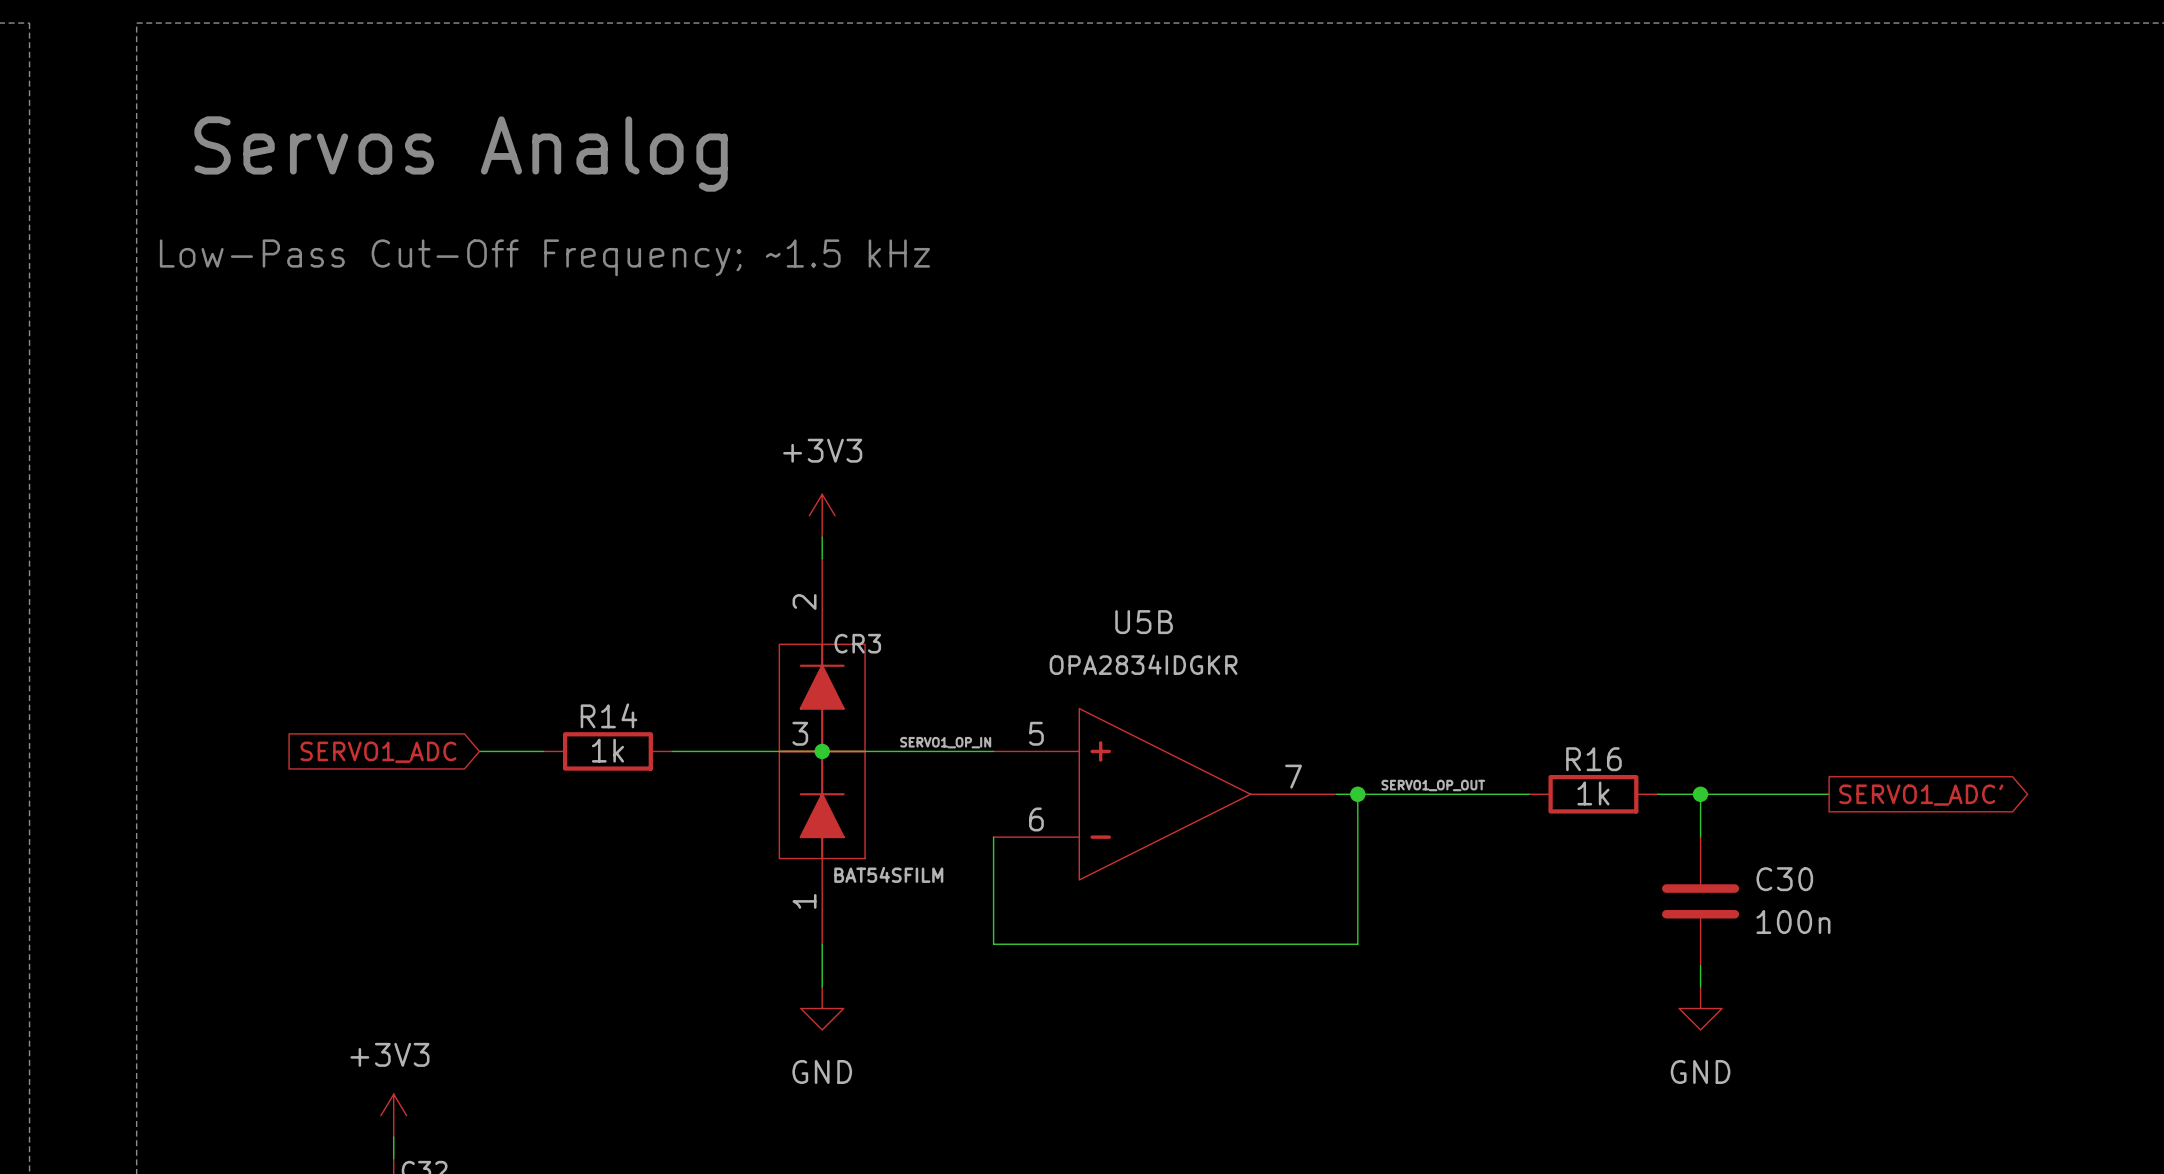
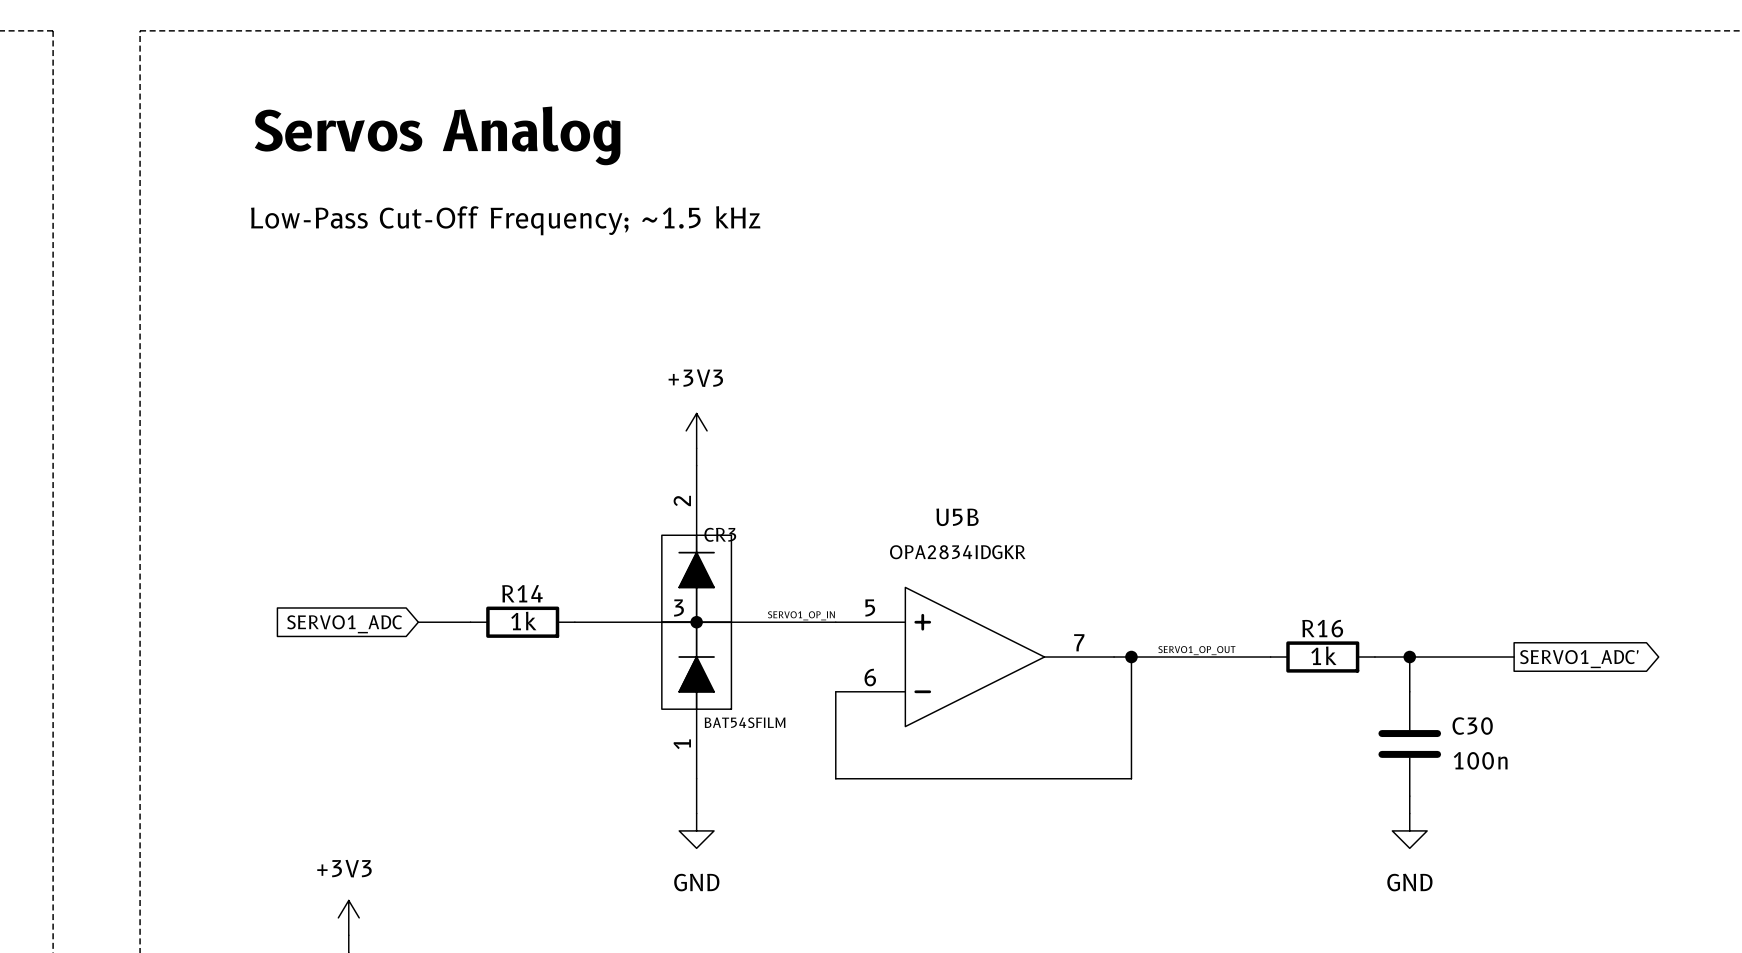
text position: Servos Analog (461, 154) -> Servos Analog (437, 135)
text position: Low-Pass Cut-Off Frequency; ~1.5 kHz (544, 257) -> Low-Pass Cut-Off Frequency; ~1.5 kHz (505, 220)

